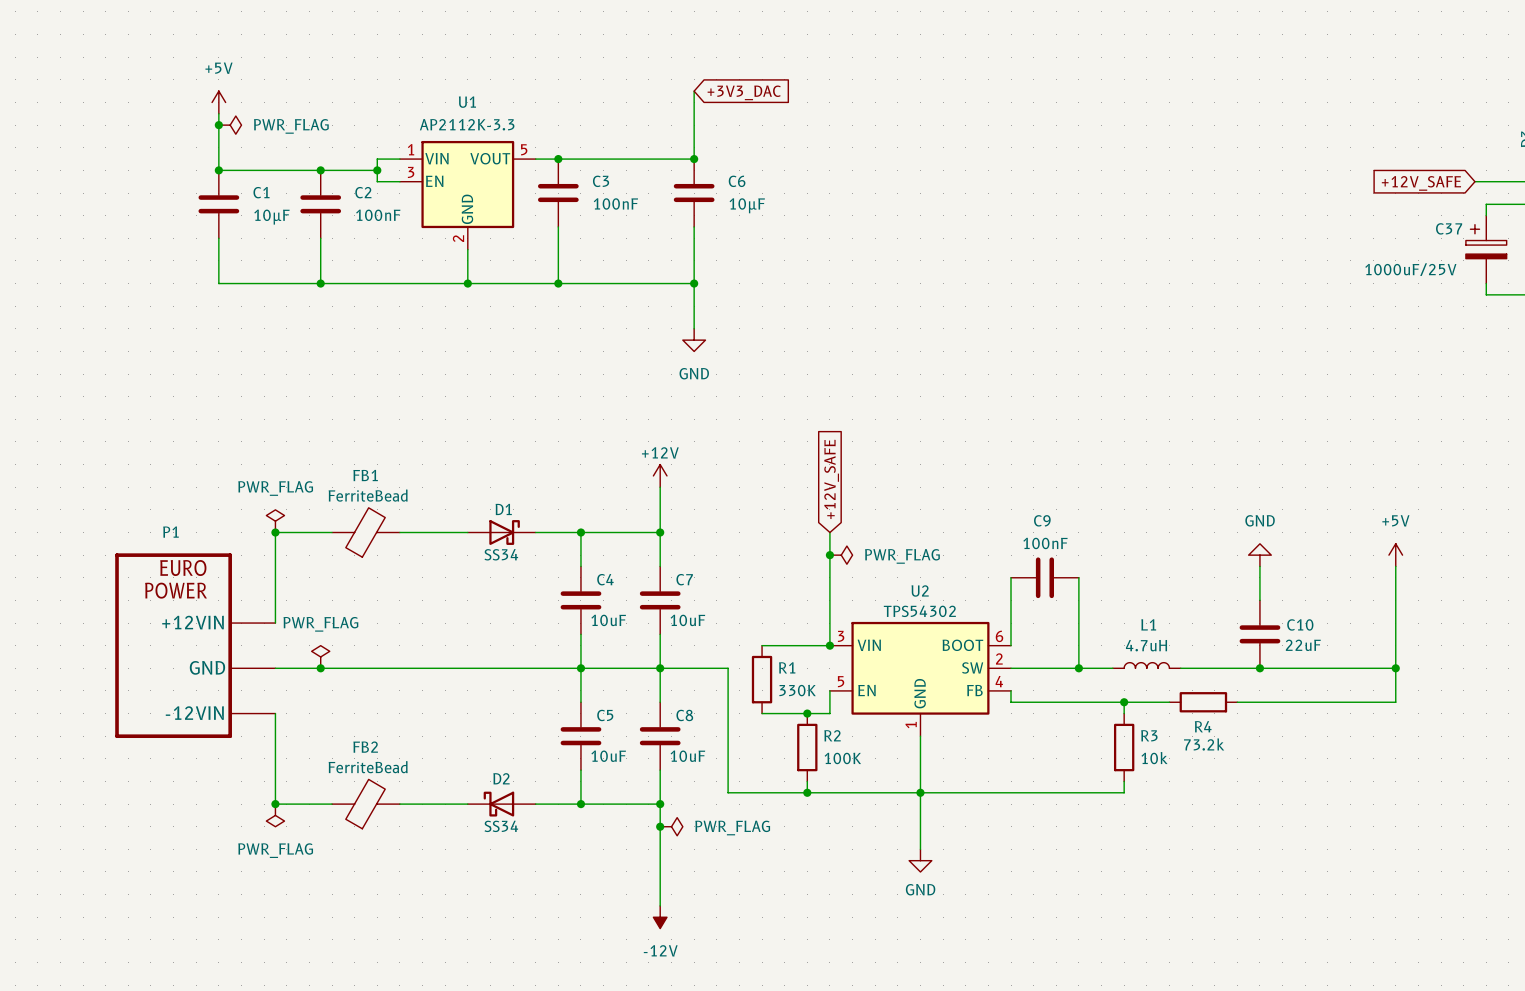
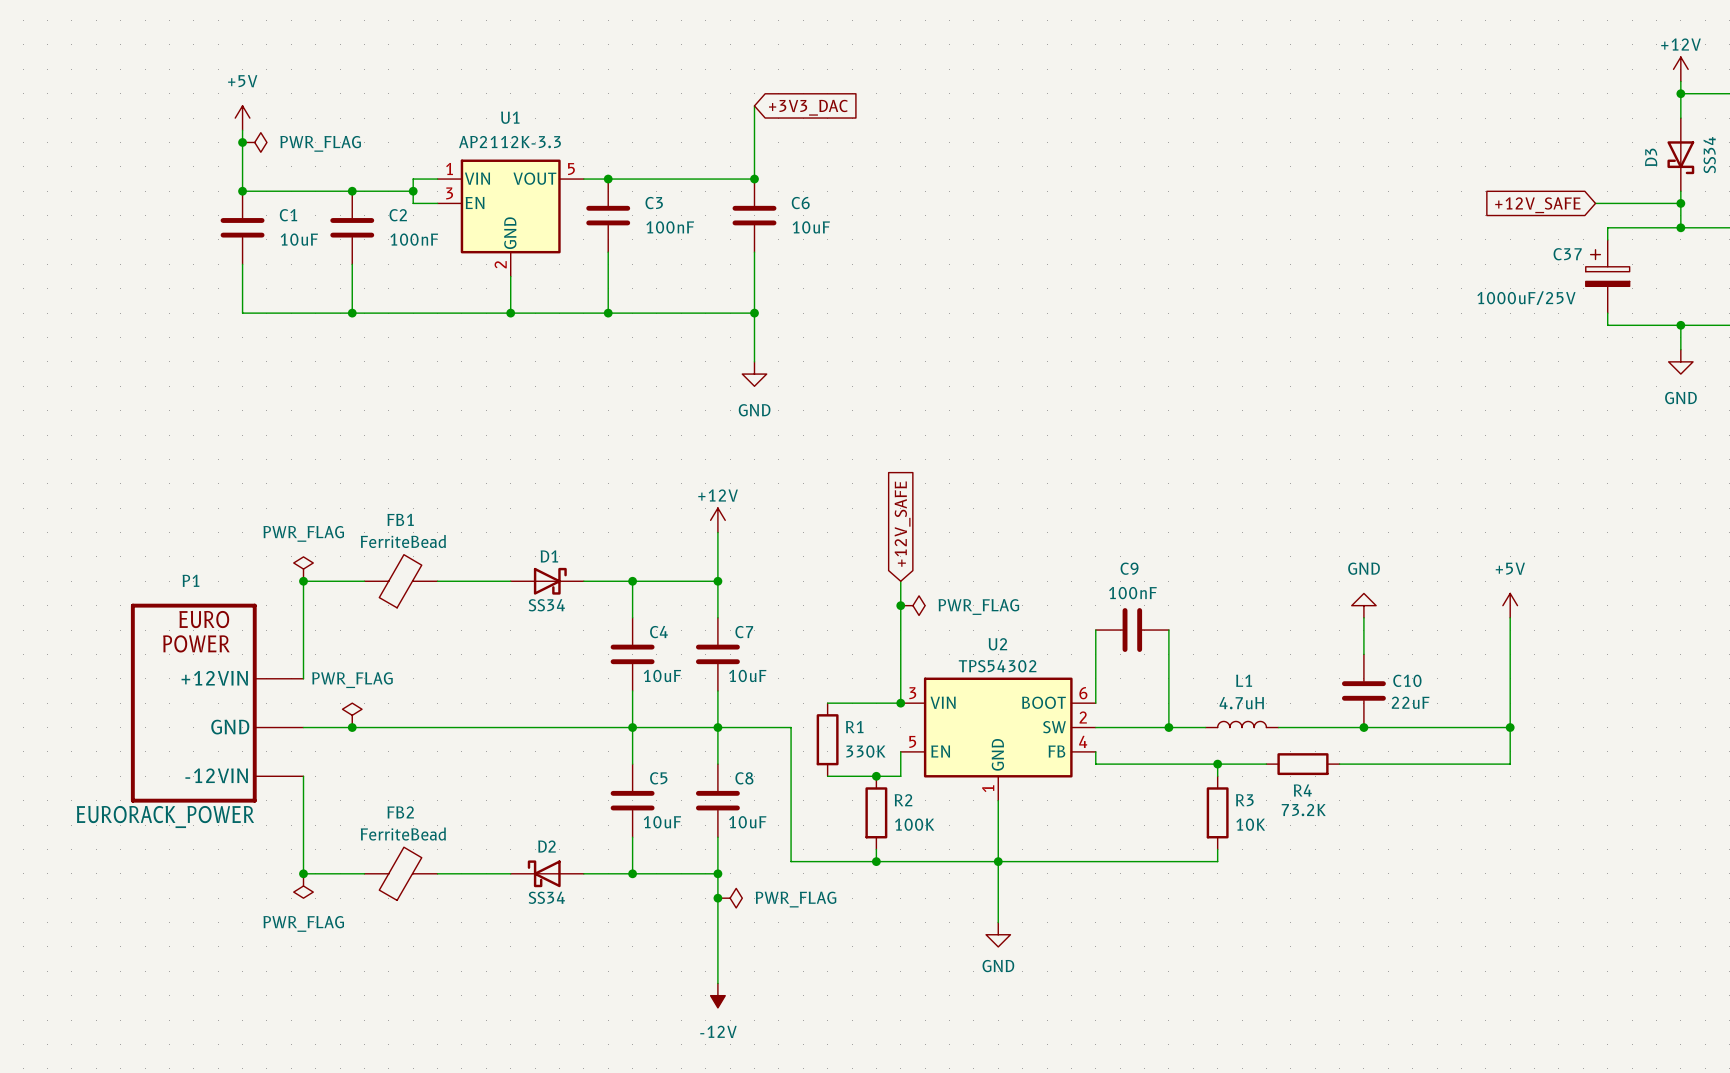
C6 value: 10µF (747, 205) -> 10uF (811, 227)
C1 value: 10µF (271, 217) -> 10uF (299, 239)
R4 value: 73.2k (1204, 744) -> 73.2K (1303, 810)
P1 value: none -> EURORACK_POWER (165, 816)
R3 value: 10k (1154, 758) -> 10K (1250, 824)

